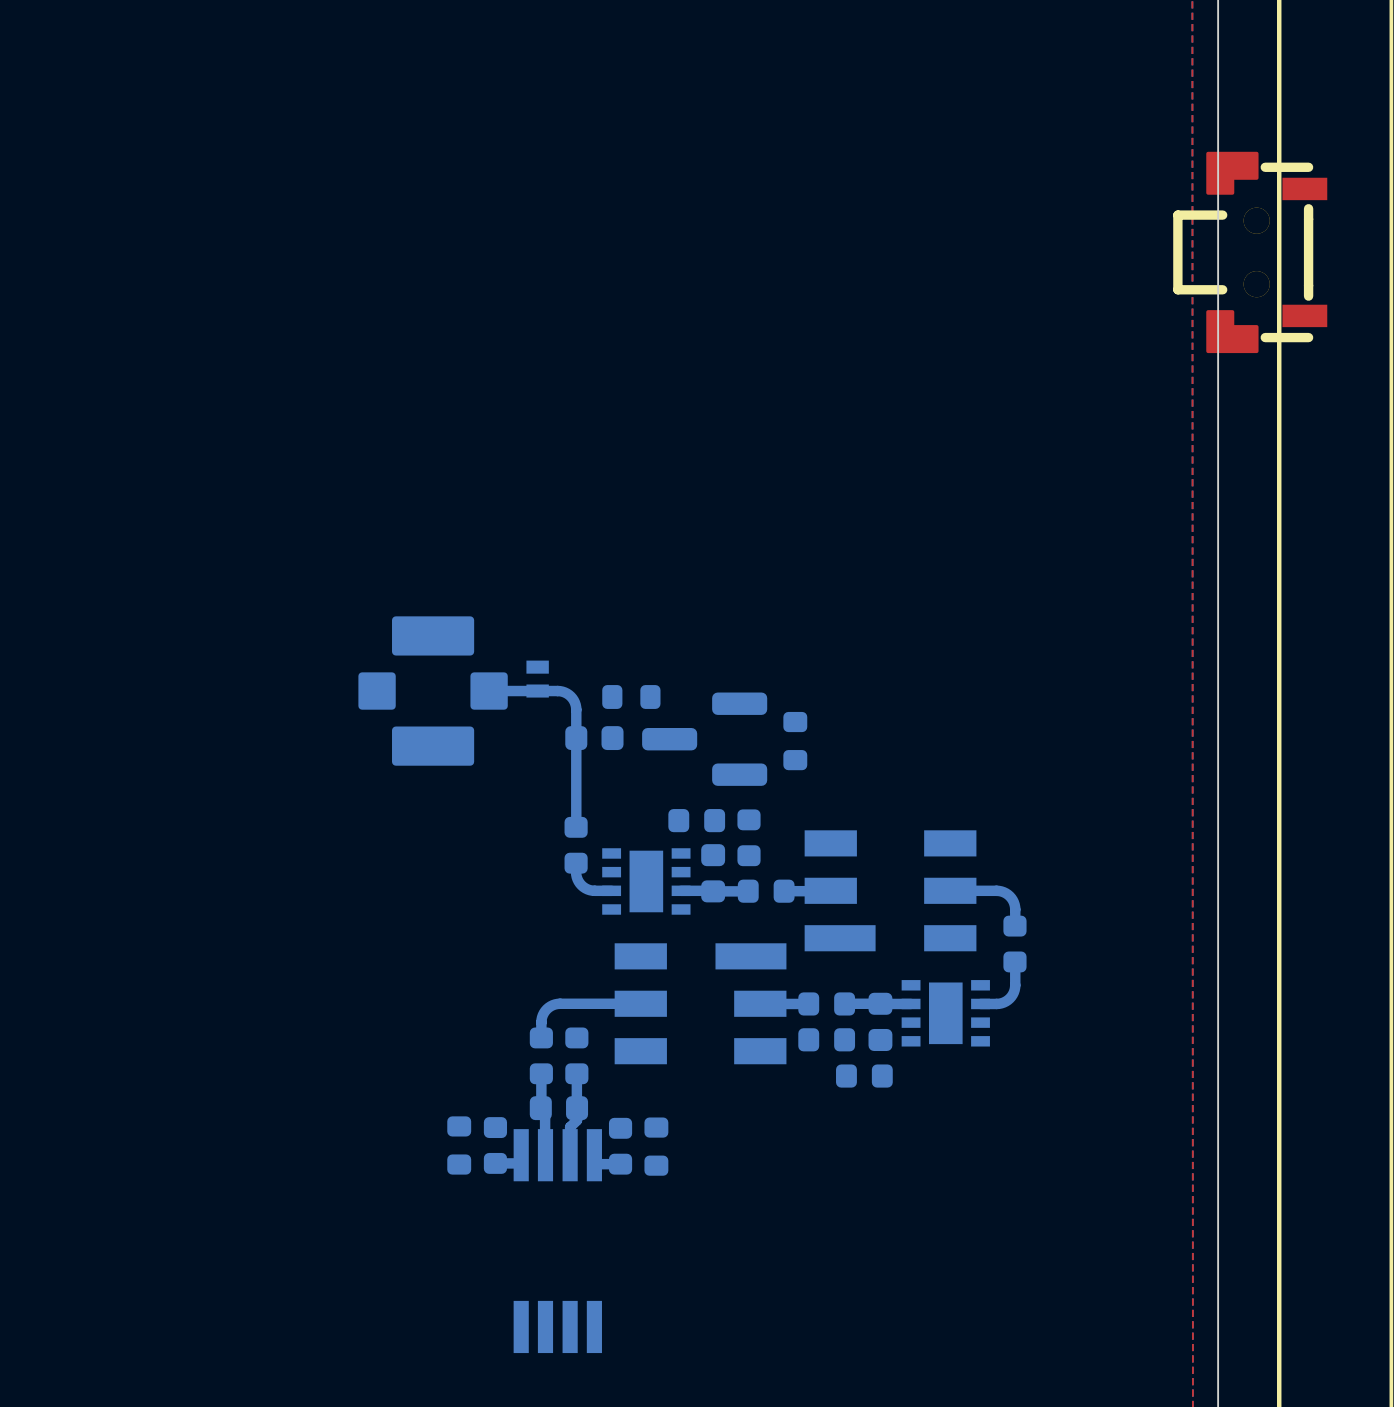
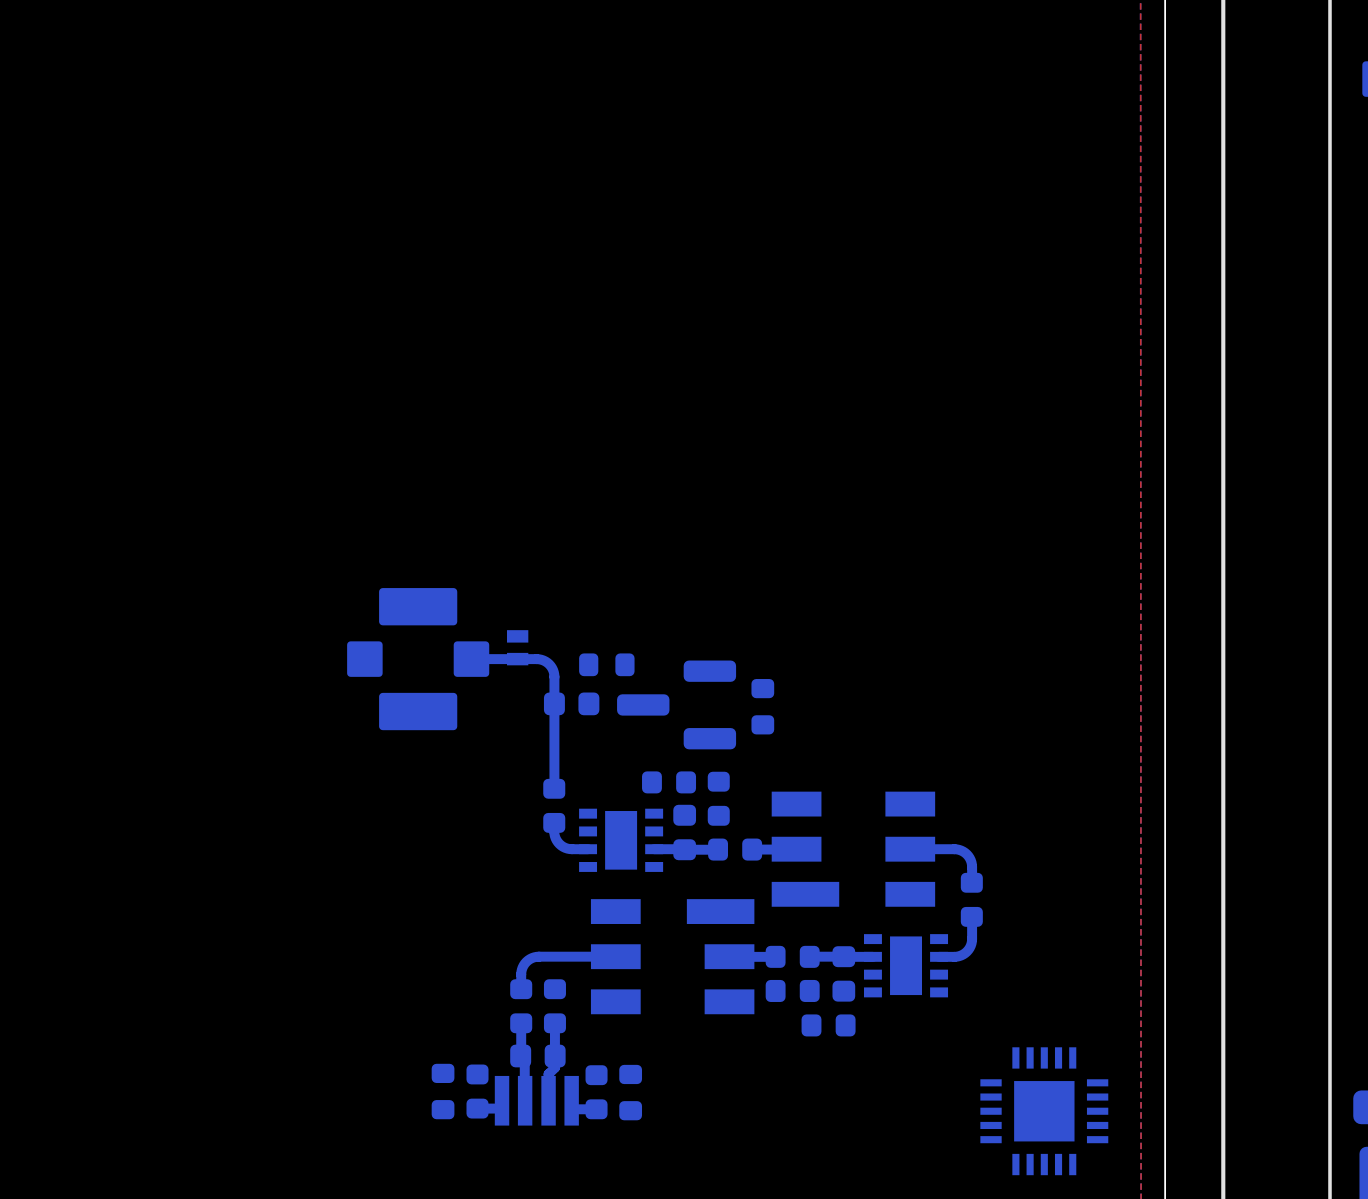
part: (1250, 252) -> none
part: none -> (1044, 1111)

